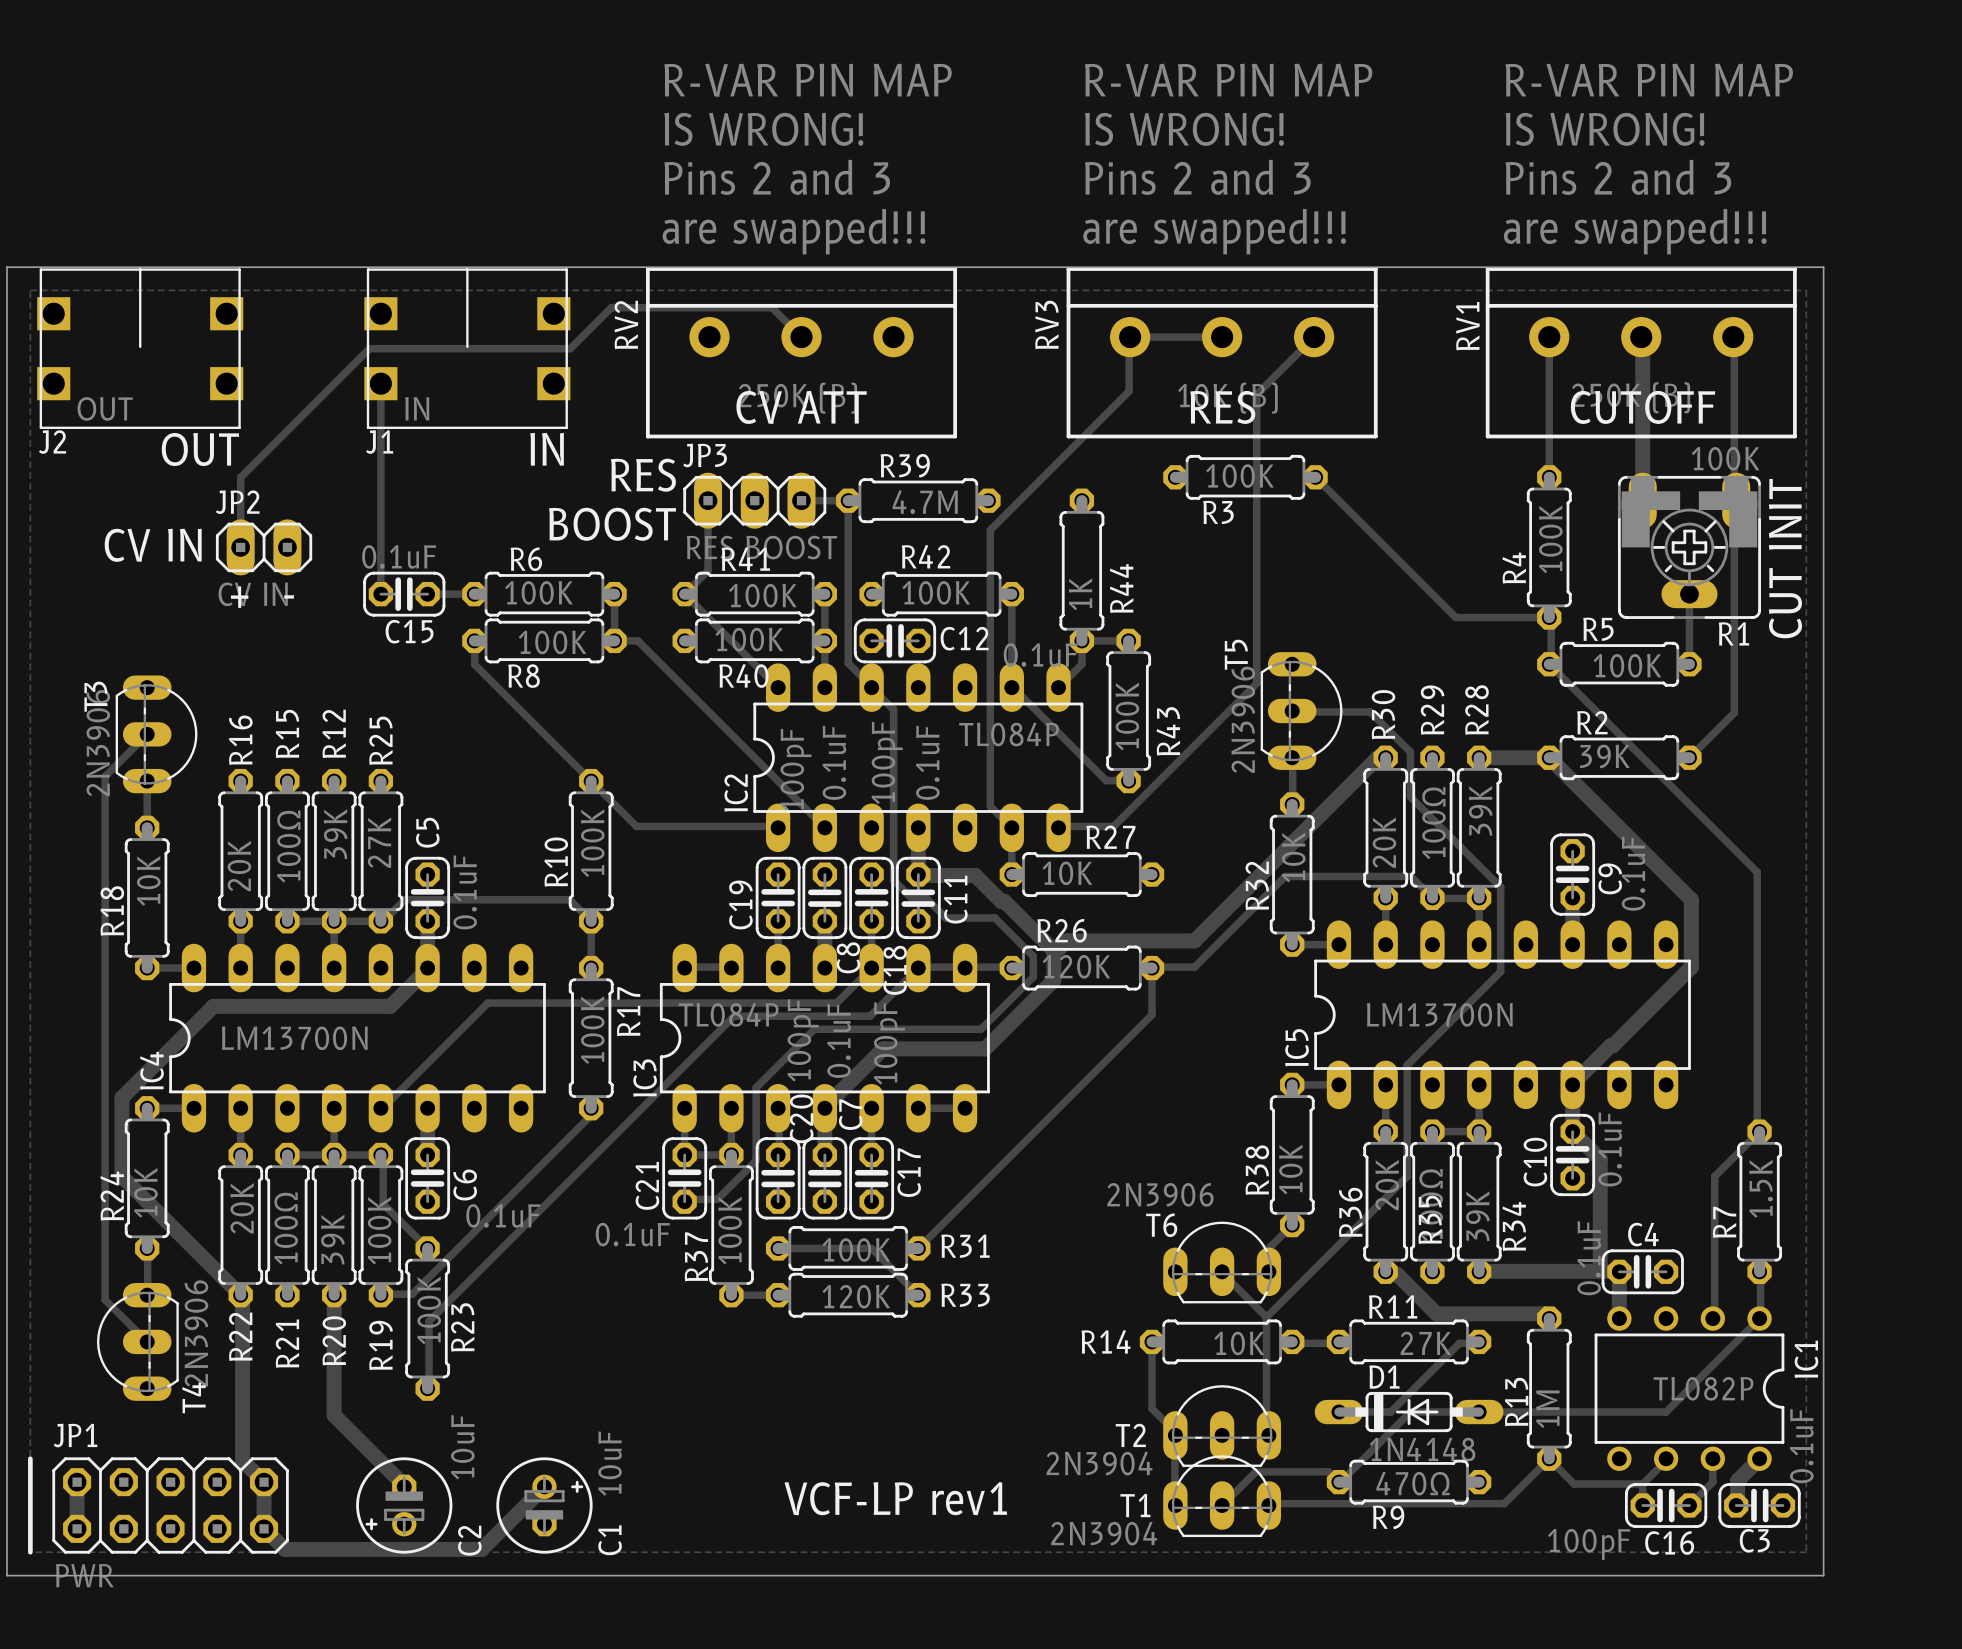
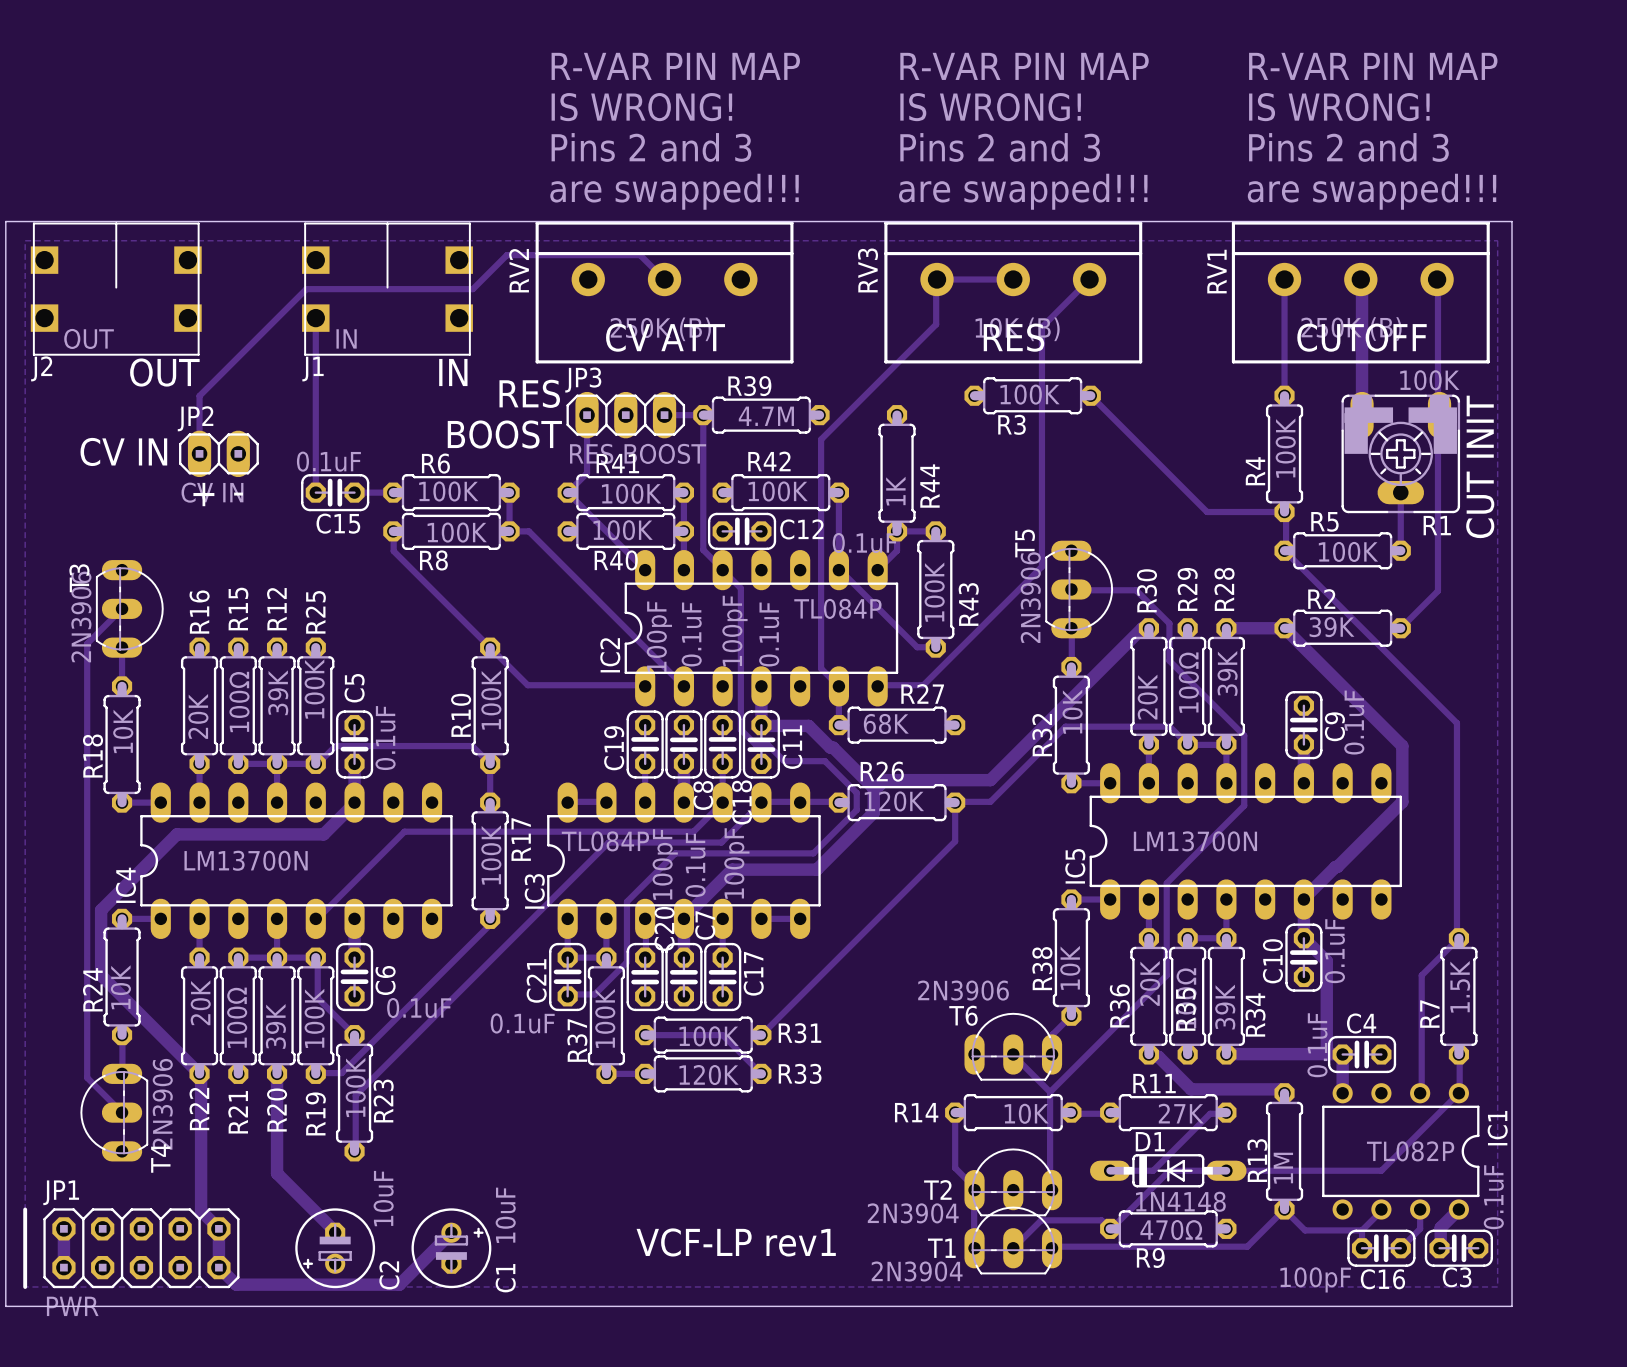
R25 value: 27K (379, 842) -> 100K (314, 689)
R27 value: 10K (1067, 873) -> 68K (886, 723)

